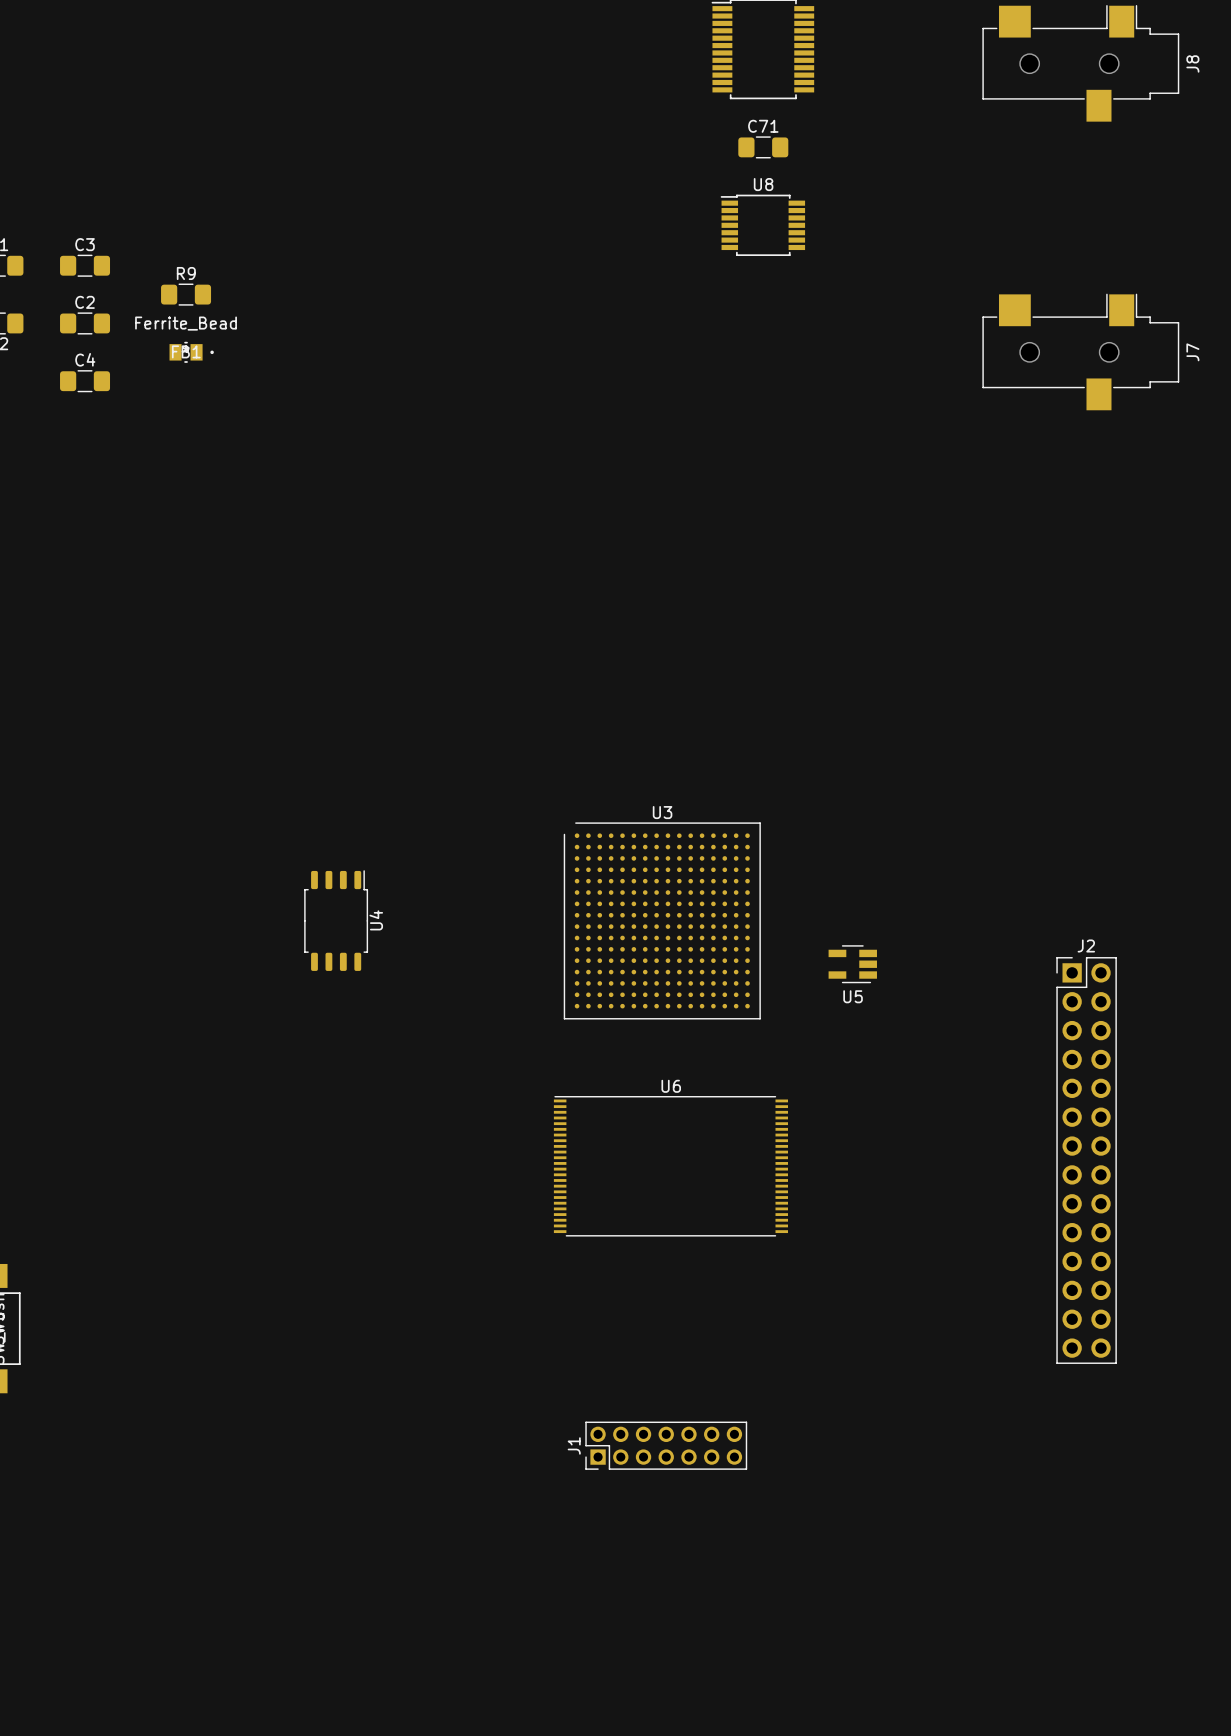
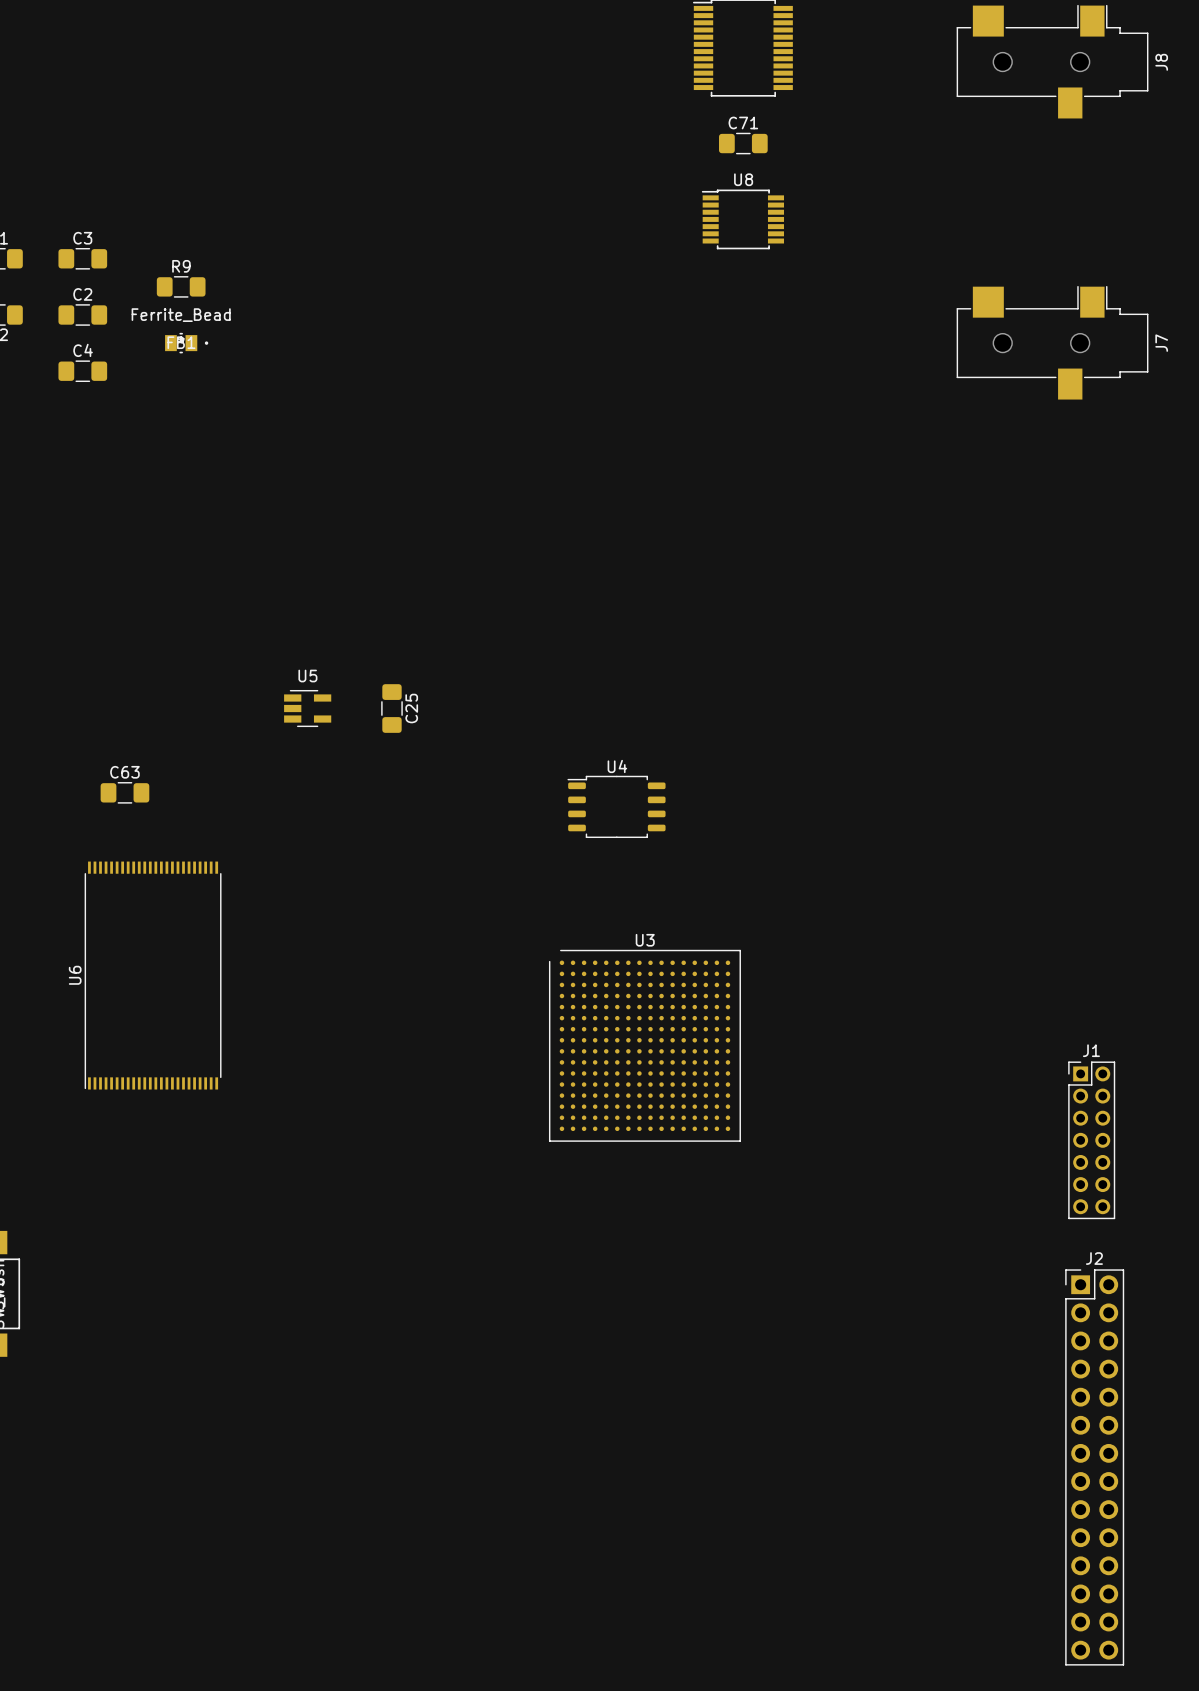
C25: none -> (391, 708)
C63: none -> (124, 792)
U4 rotation: 0° (336, 920) -> 90° counterclockwise (616, 806)
U4 position: (336, 920) -> (616, 806)
U3 position: (662, 920) -> (644, 1045)
U5 rotation: 0° (852, 964) -> 180° (307, 708)
U5 position: (852, 964) -> (307, 708)
J2 position: (1086, 1160) -> (1094, 1467)
U6 rotation: 0° (670, 1166) -> 90° counterclockwise (153, 975)
U6 position: (670, 1166) -> (153, 975)
J1 rotation: 0° (666, 1445) -> 90° clockwise (1091, 1140)
J1 position: (666, 1445) -> (1091, 1140)

